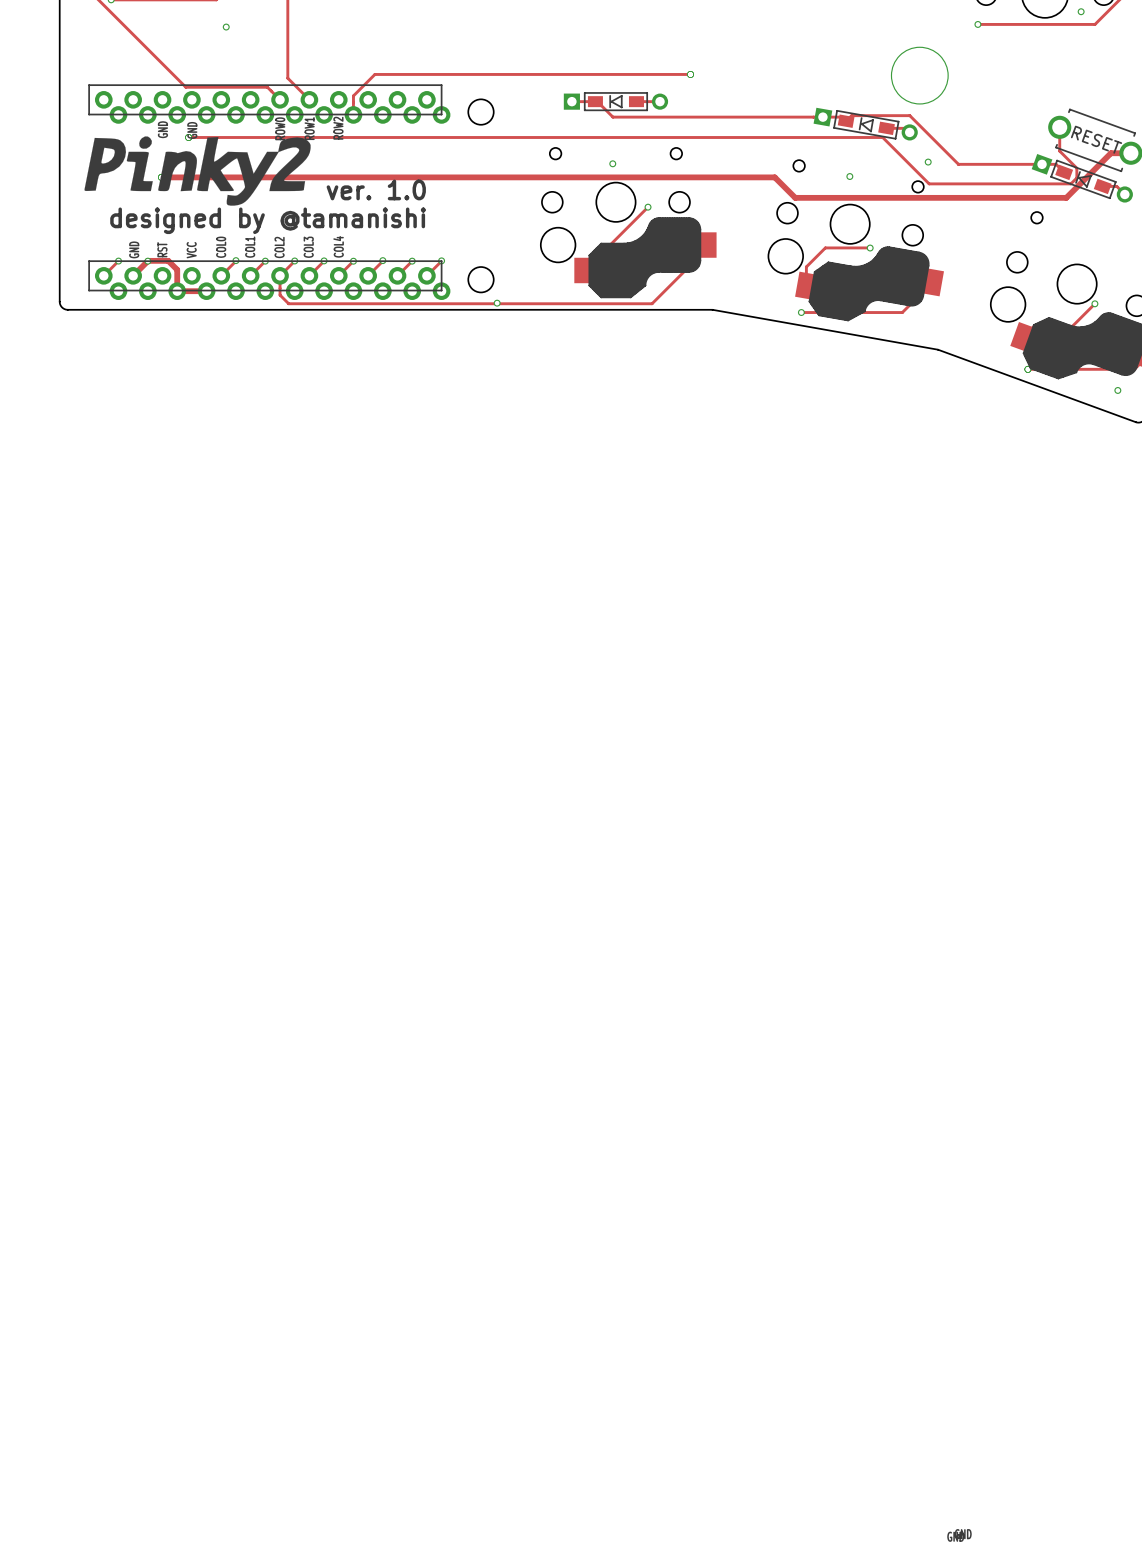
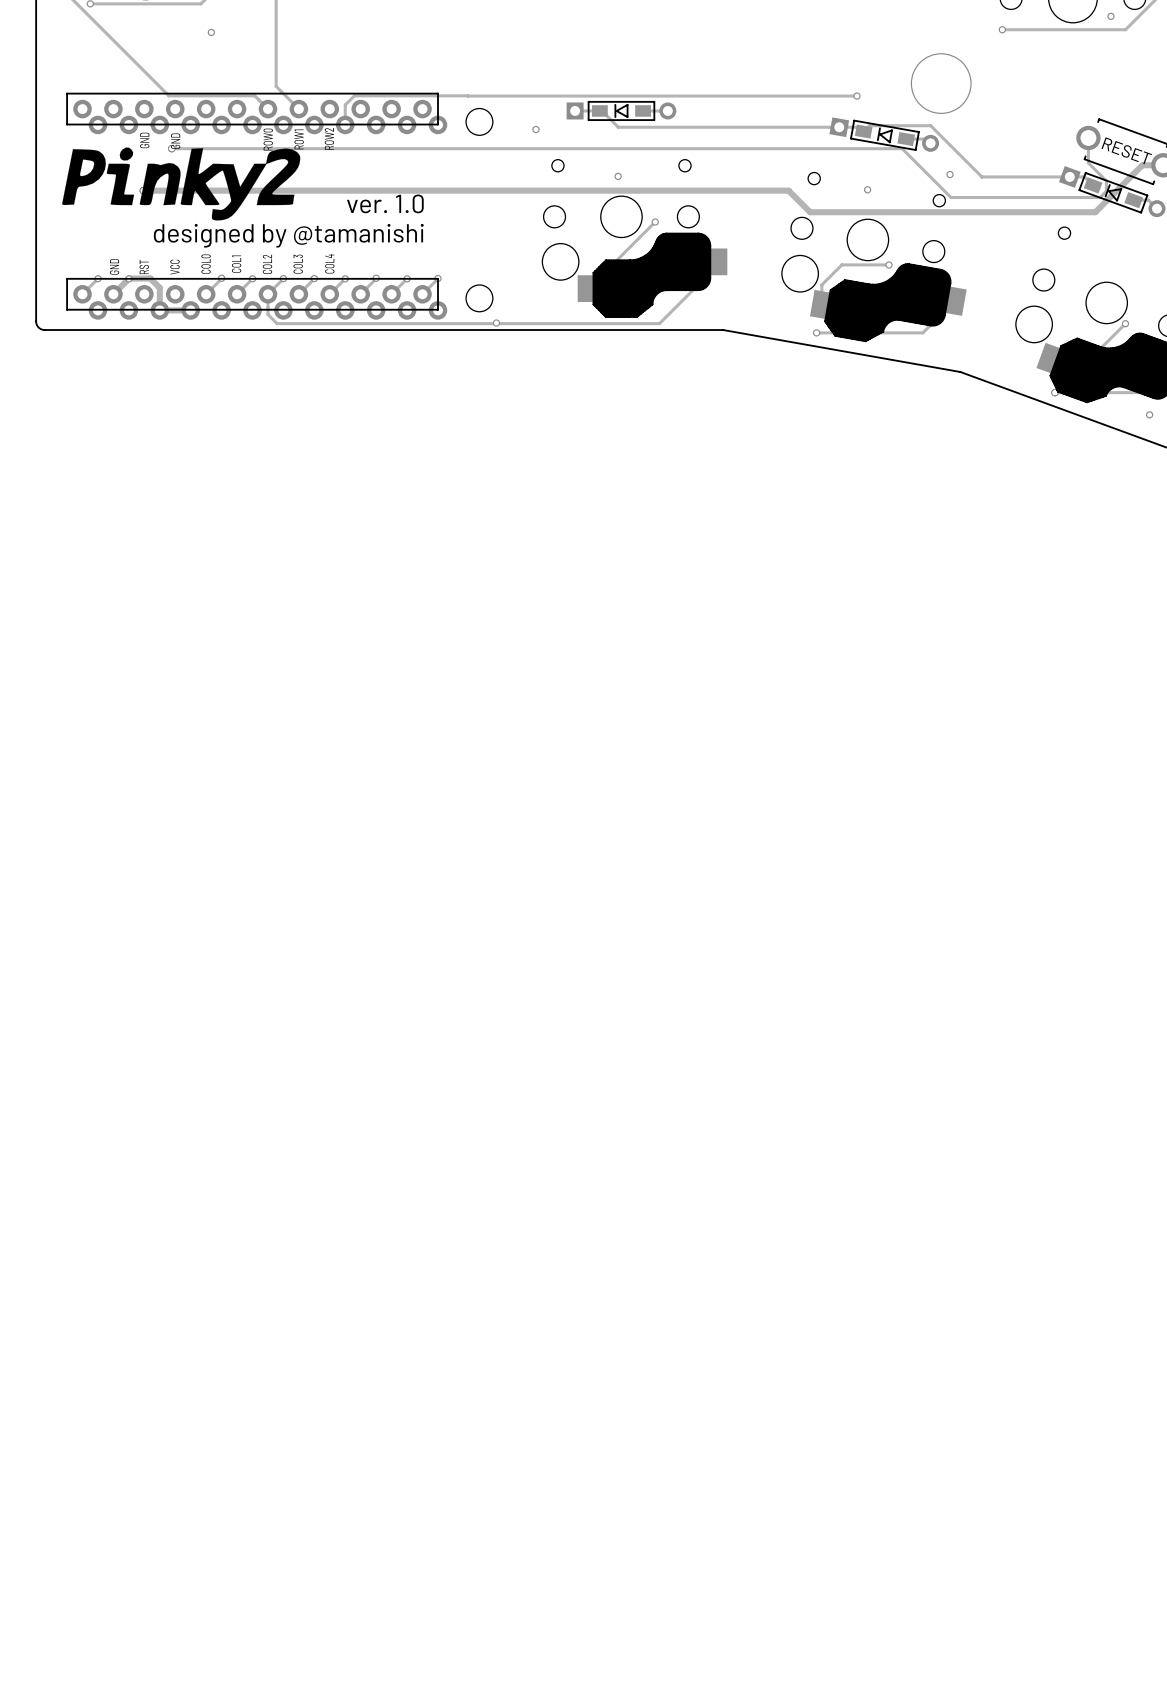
track: (690, 74) (374, 74) (362, 87) -> (856, 96) (354, 95)
via: (690, 74) -> none
via: none -> (856, 96)
via: none -> (535, 129)
drawing: [947, 1529, 972, 1542] -> none

